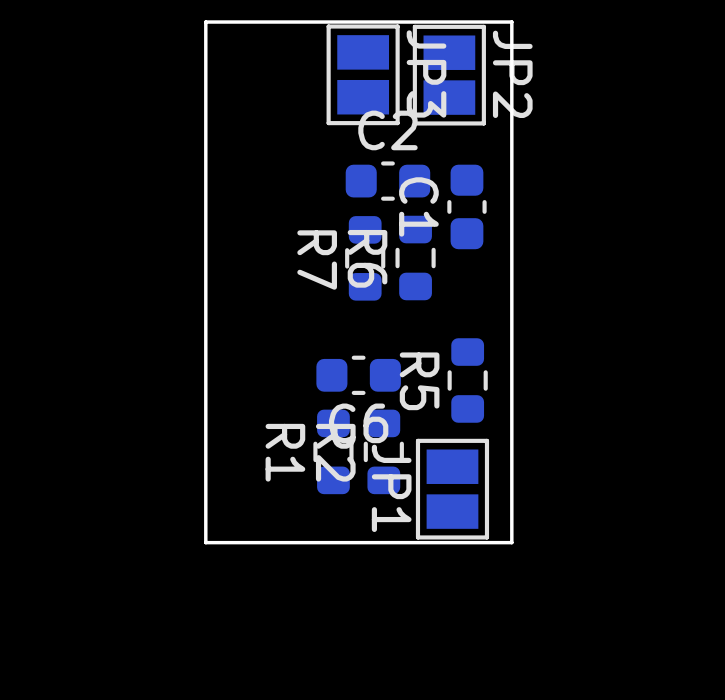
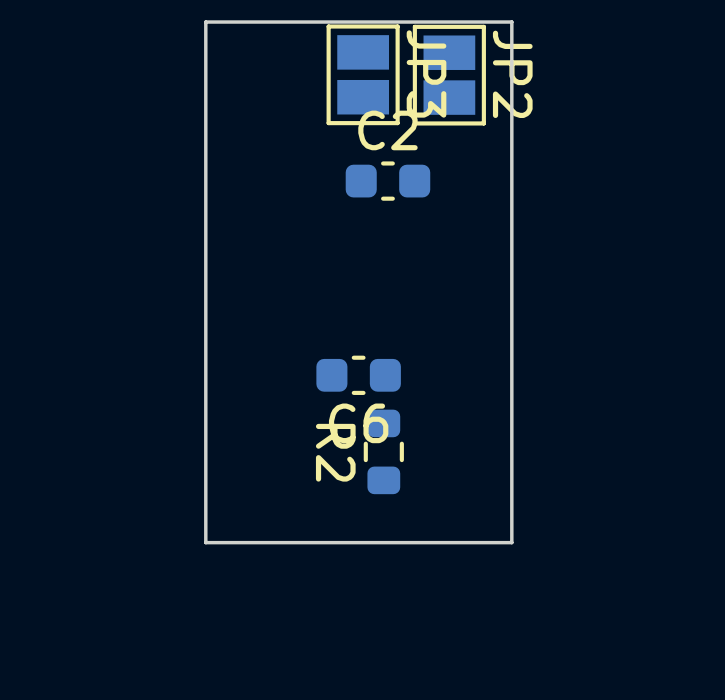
C1: (466, 206) -> none
R7: (365, 258) -> none
R6: (415, 258) -> none
R5: (467, 380) -> none
R1: (333, 451) -> none
JP1: (452, 489) -> none

